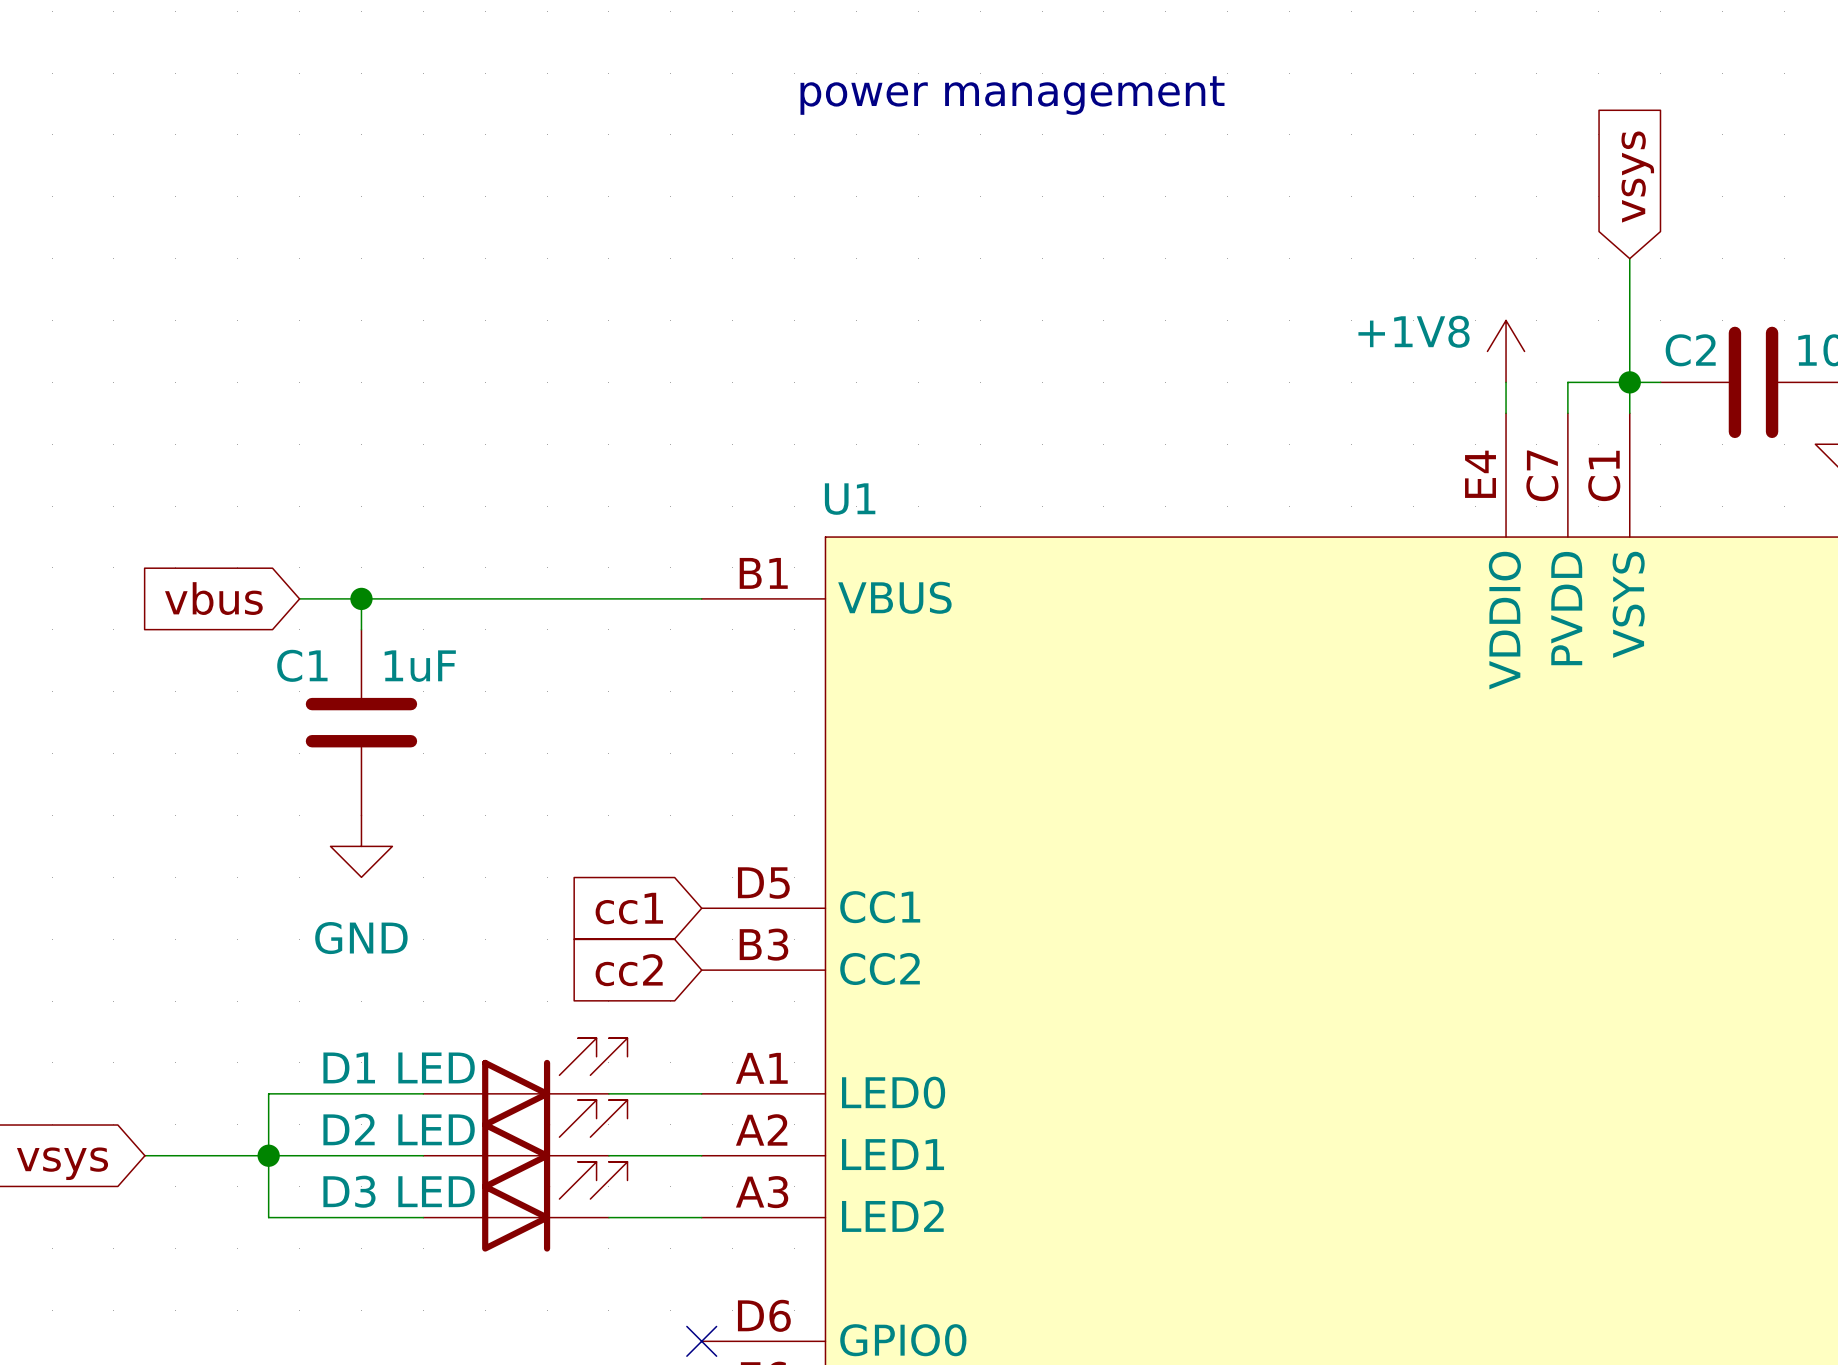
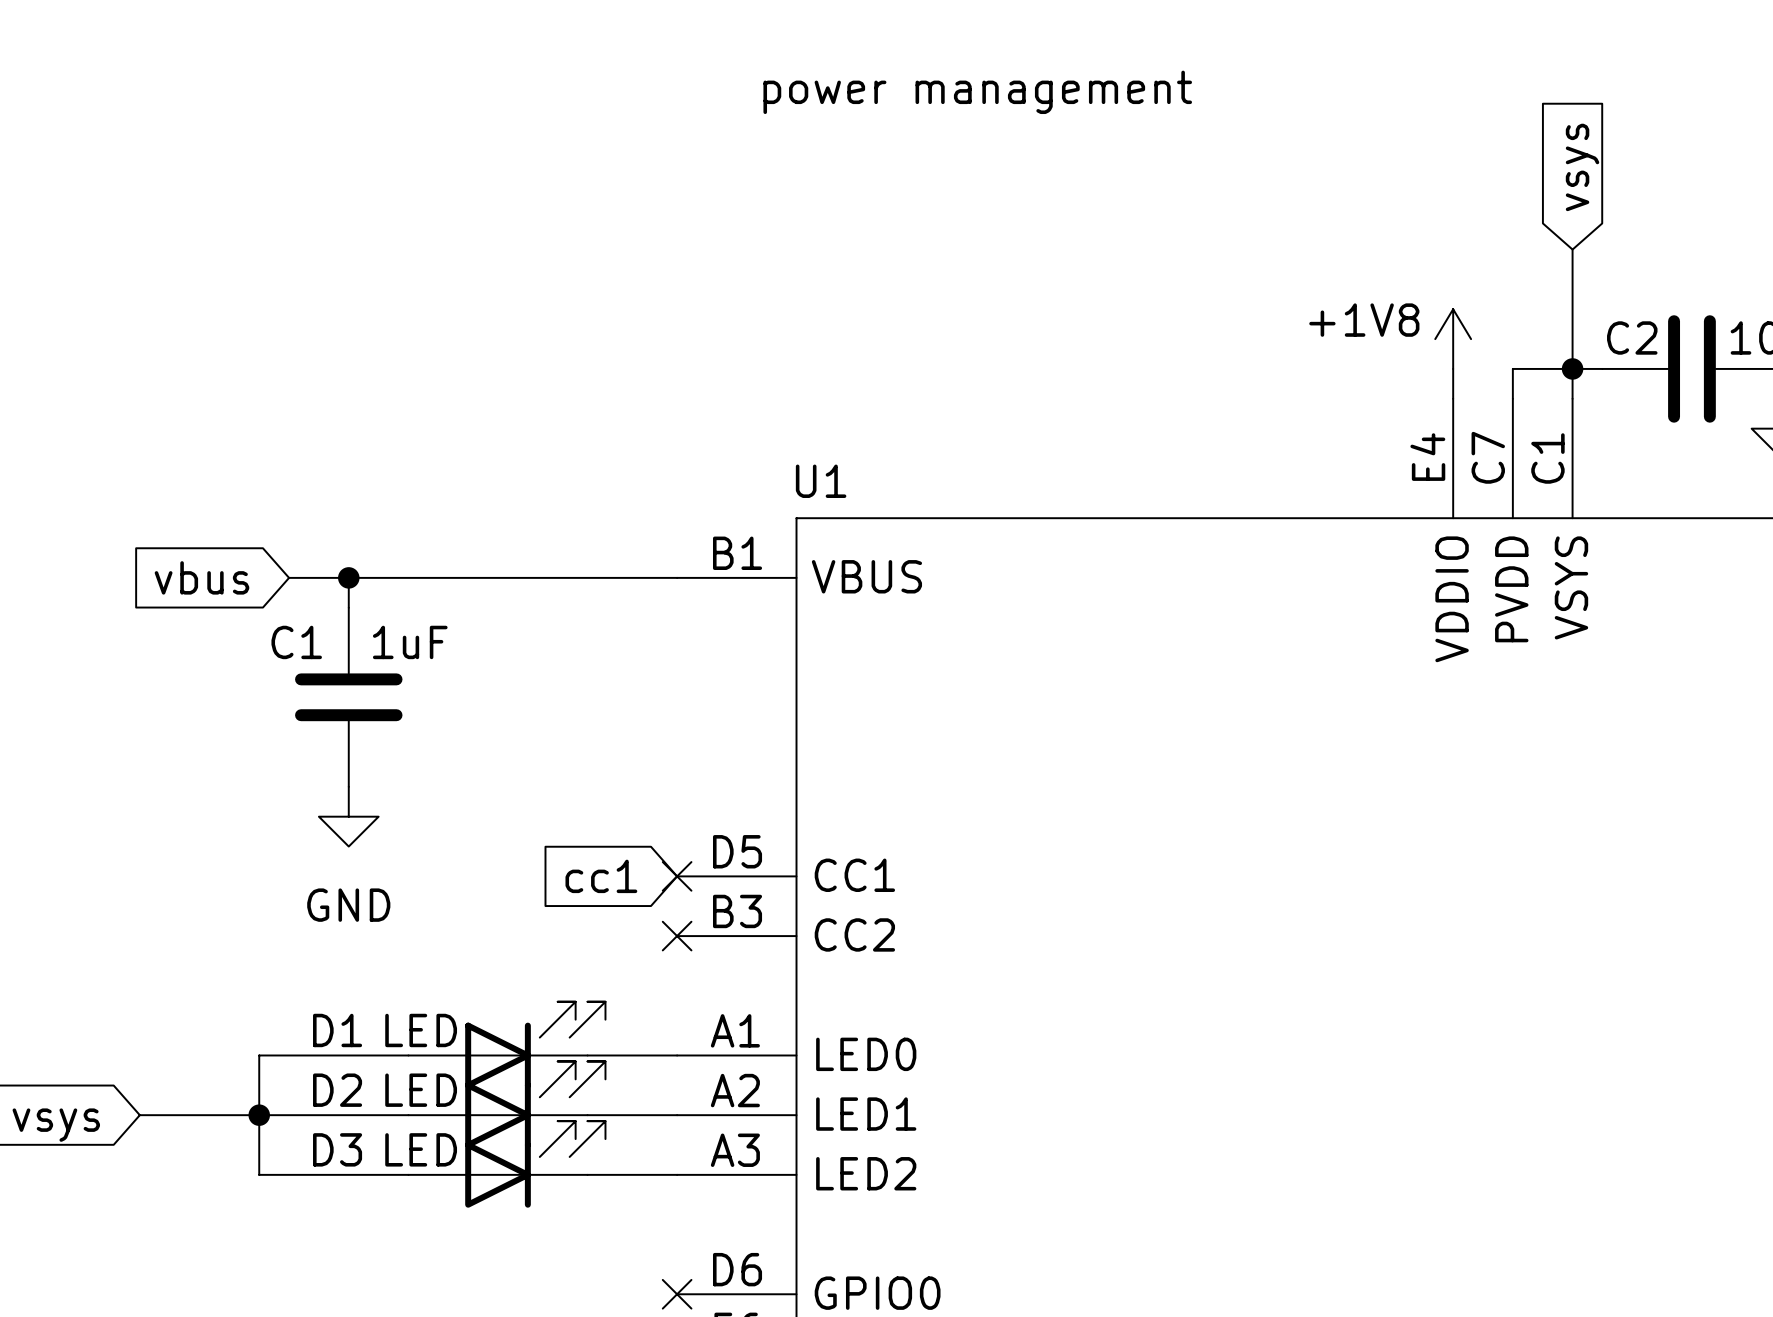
no-connect mark: none -> (677, 876)
global label: cc2 (629, 970) -> none
no-connect mark: none -> (677, 936)

